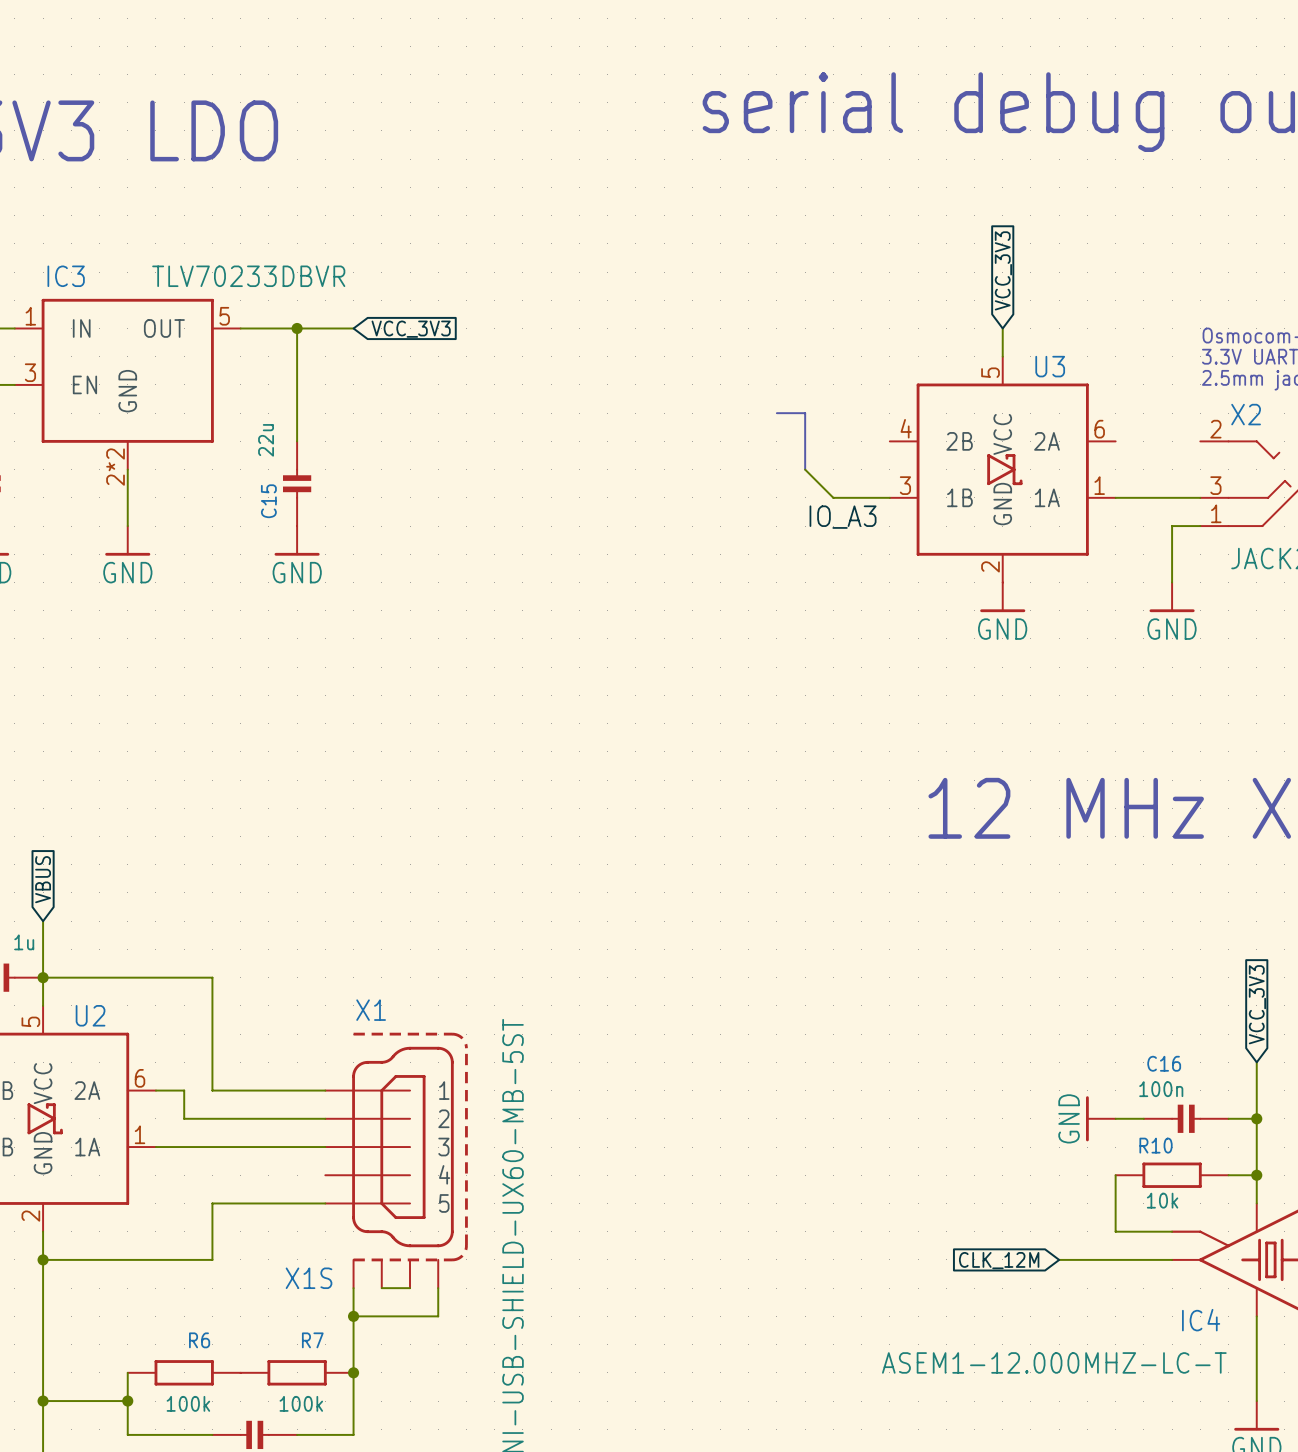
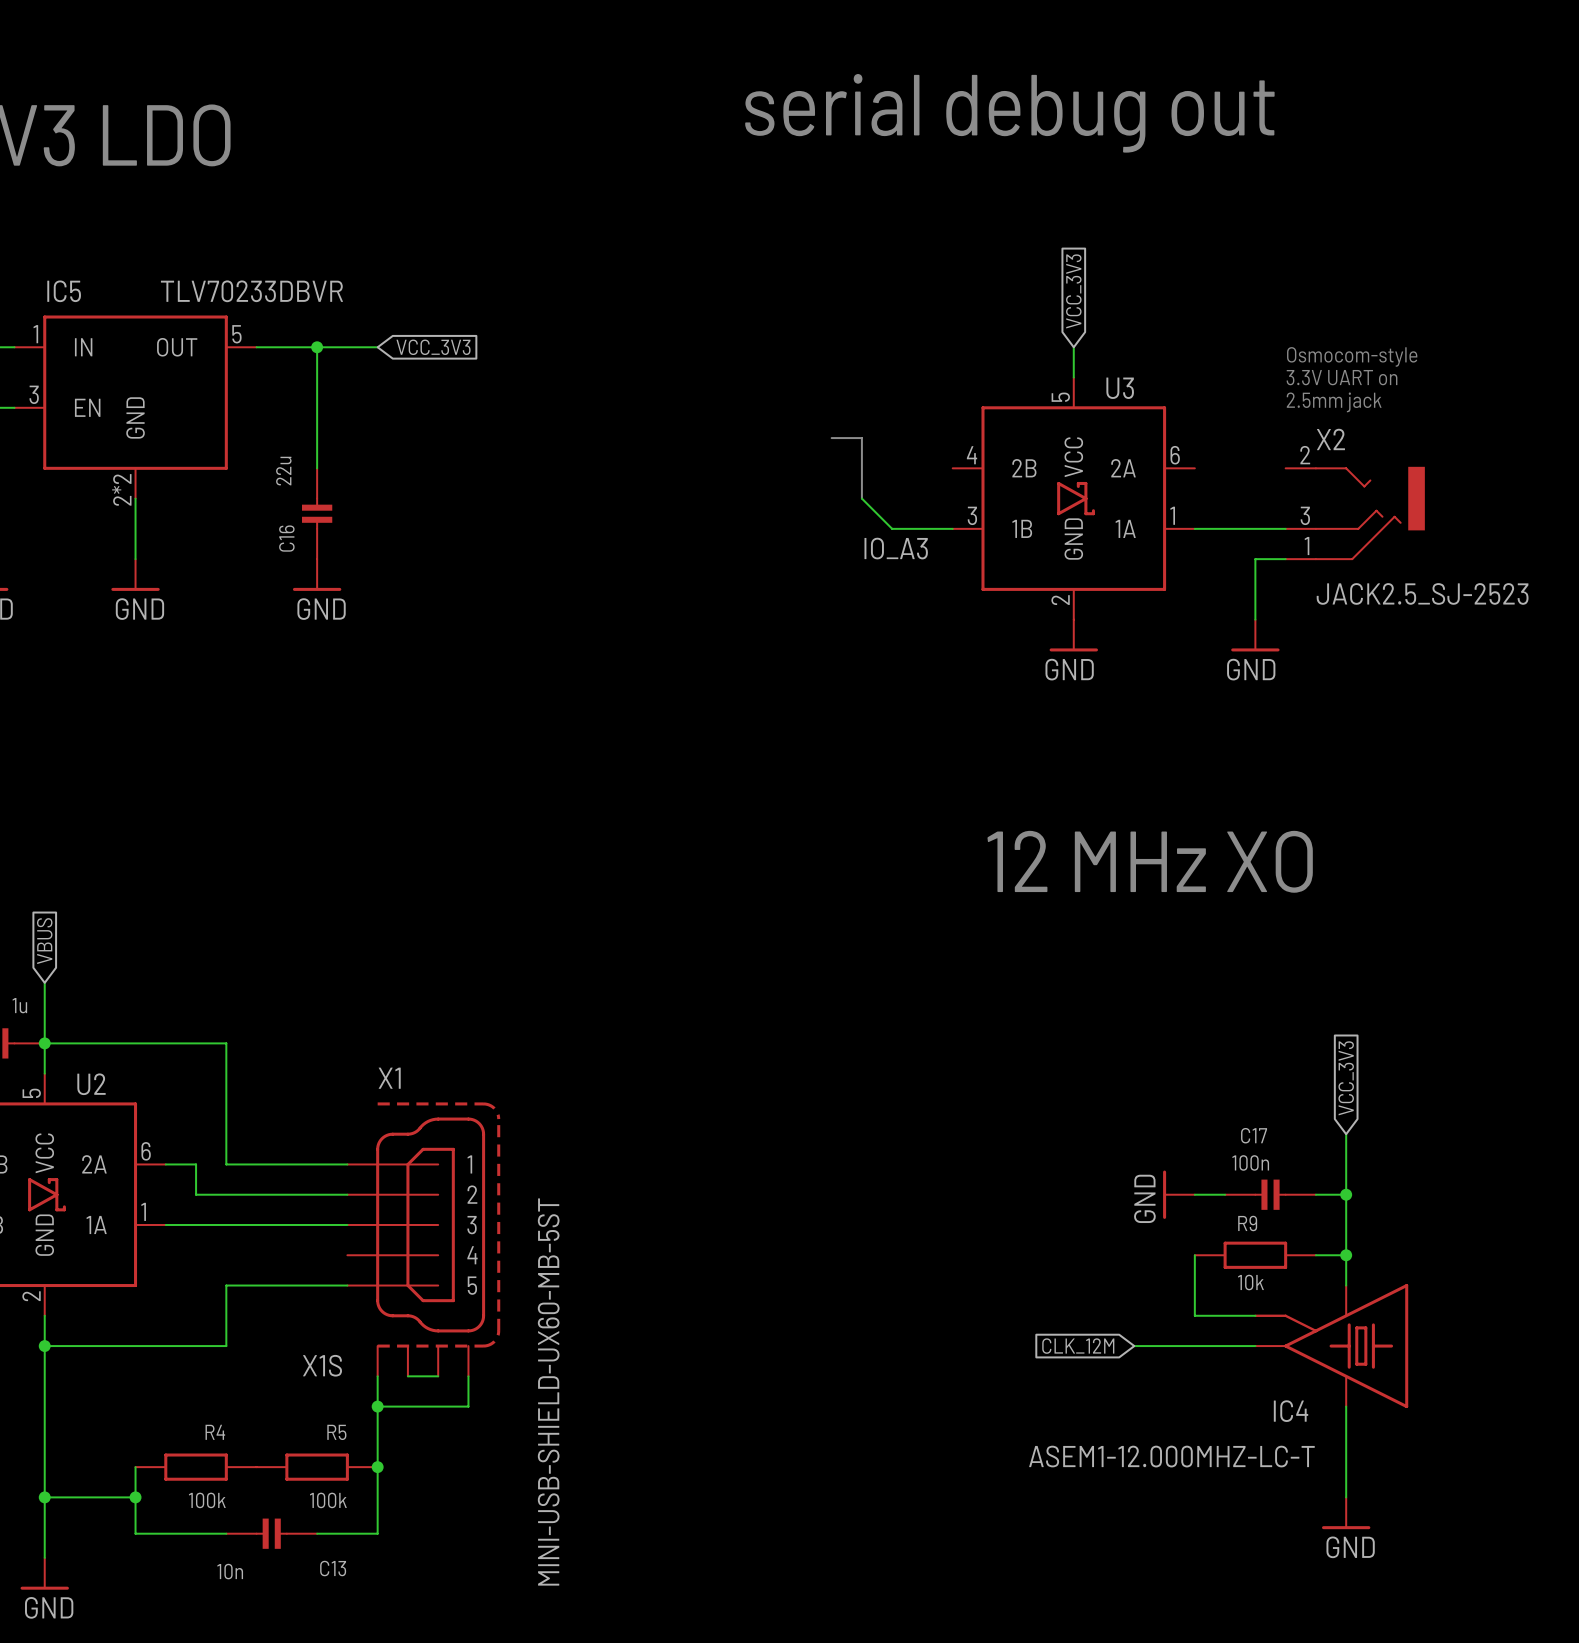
IC3 name: IC3 (66, 276) -> IC5 (64, 291)
C15 name: C15 (268, 501) -> C16 (286, 538)
C16 name: C16 (1164, 1063) -> C17 (1254, 1135)
R10 name: R10 (1156, 1145) -> R9 (1247, 1223)
R6 name: R6 (199, 1340) -> R4 (215, 1432)
R7 name: R7 (312, 1340) -> R5 (336, 1432)

